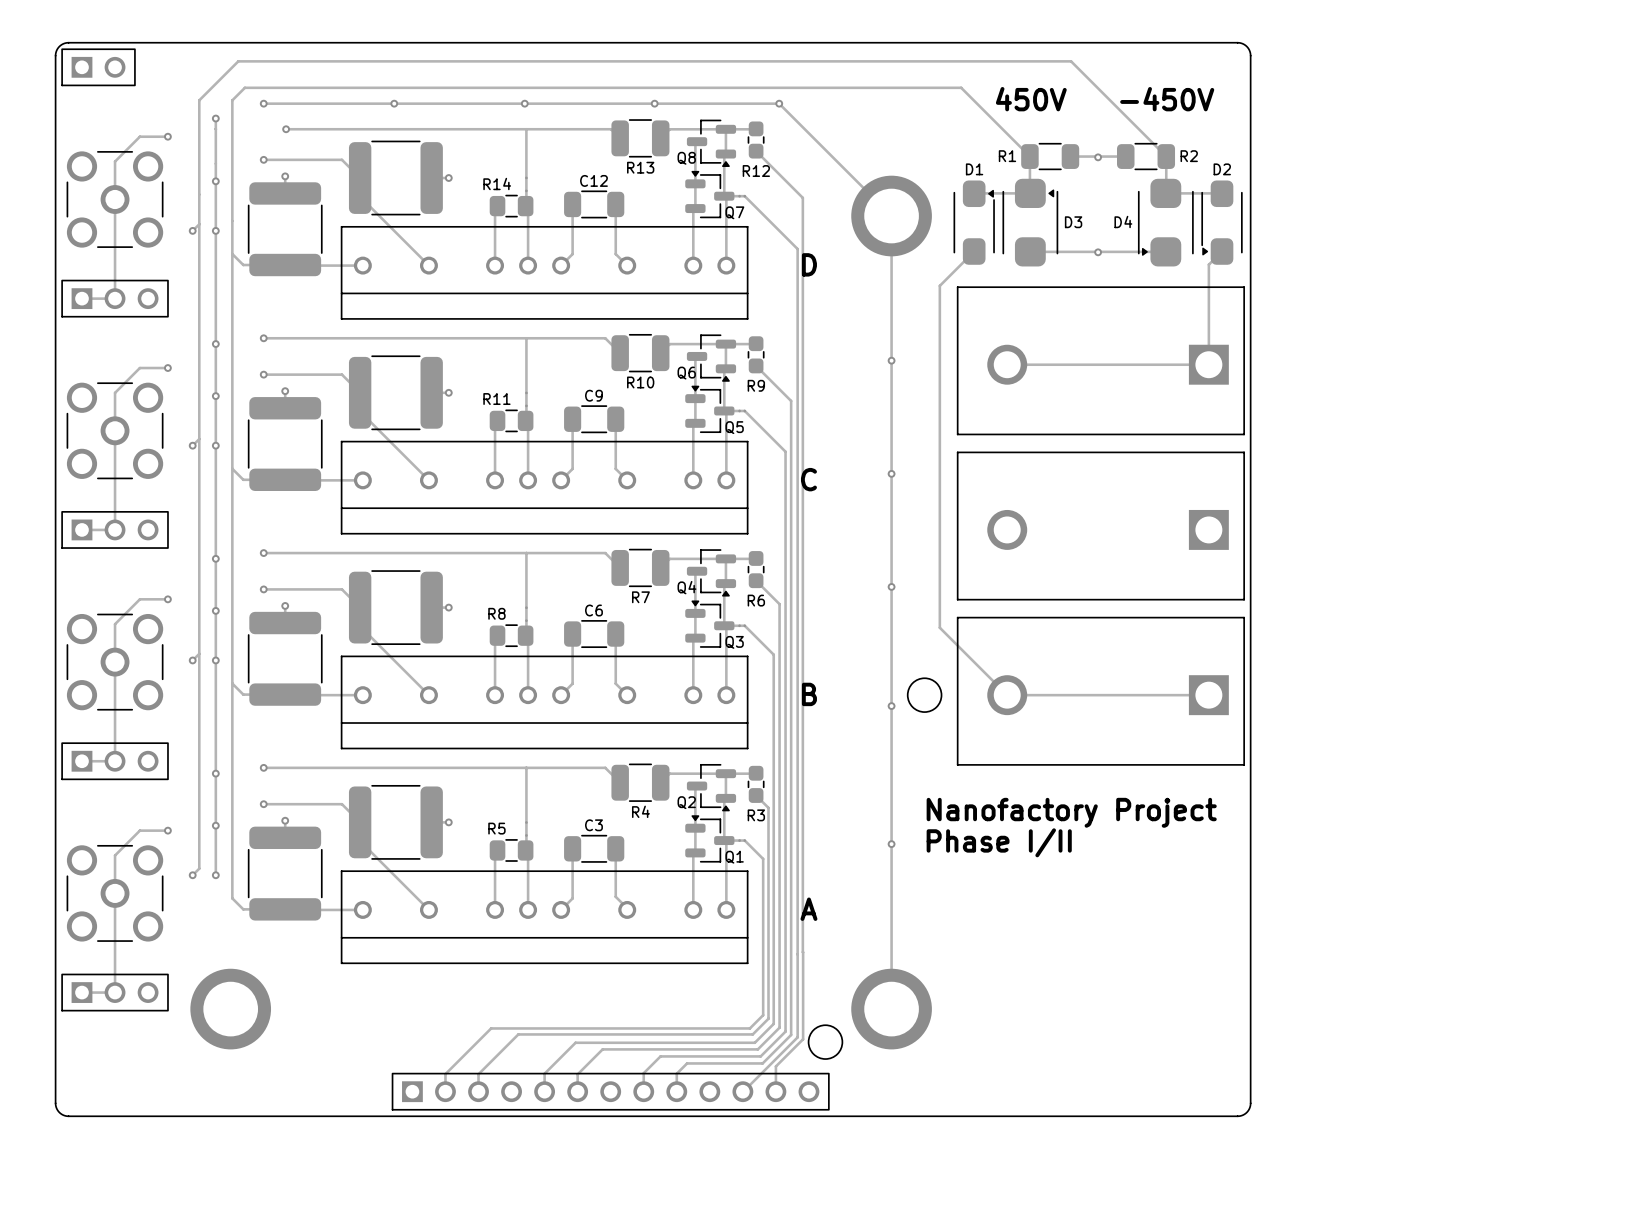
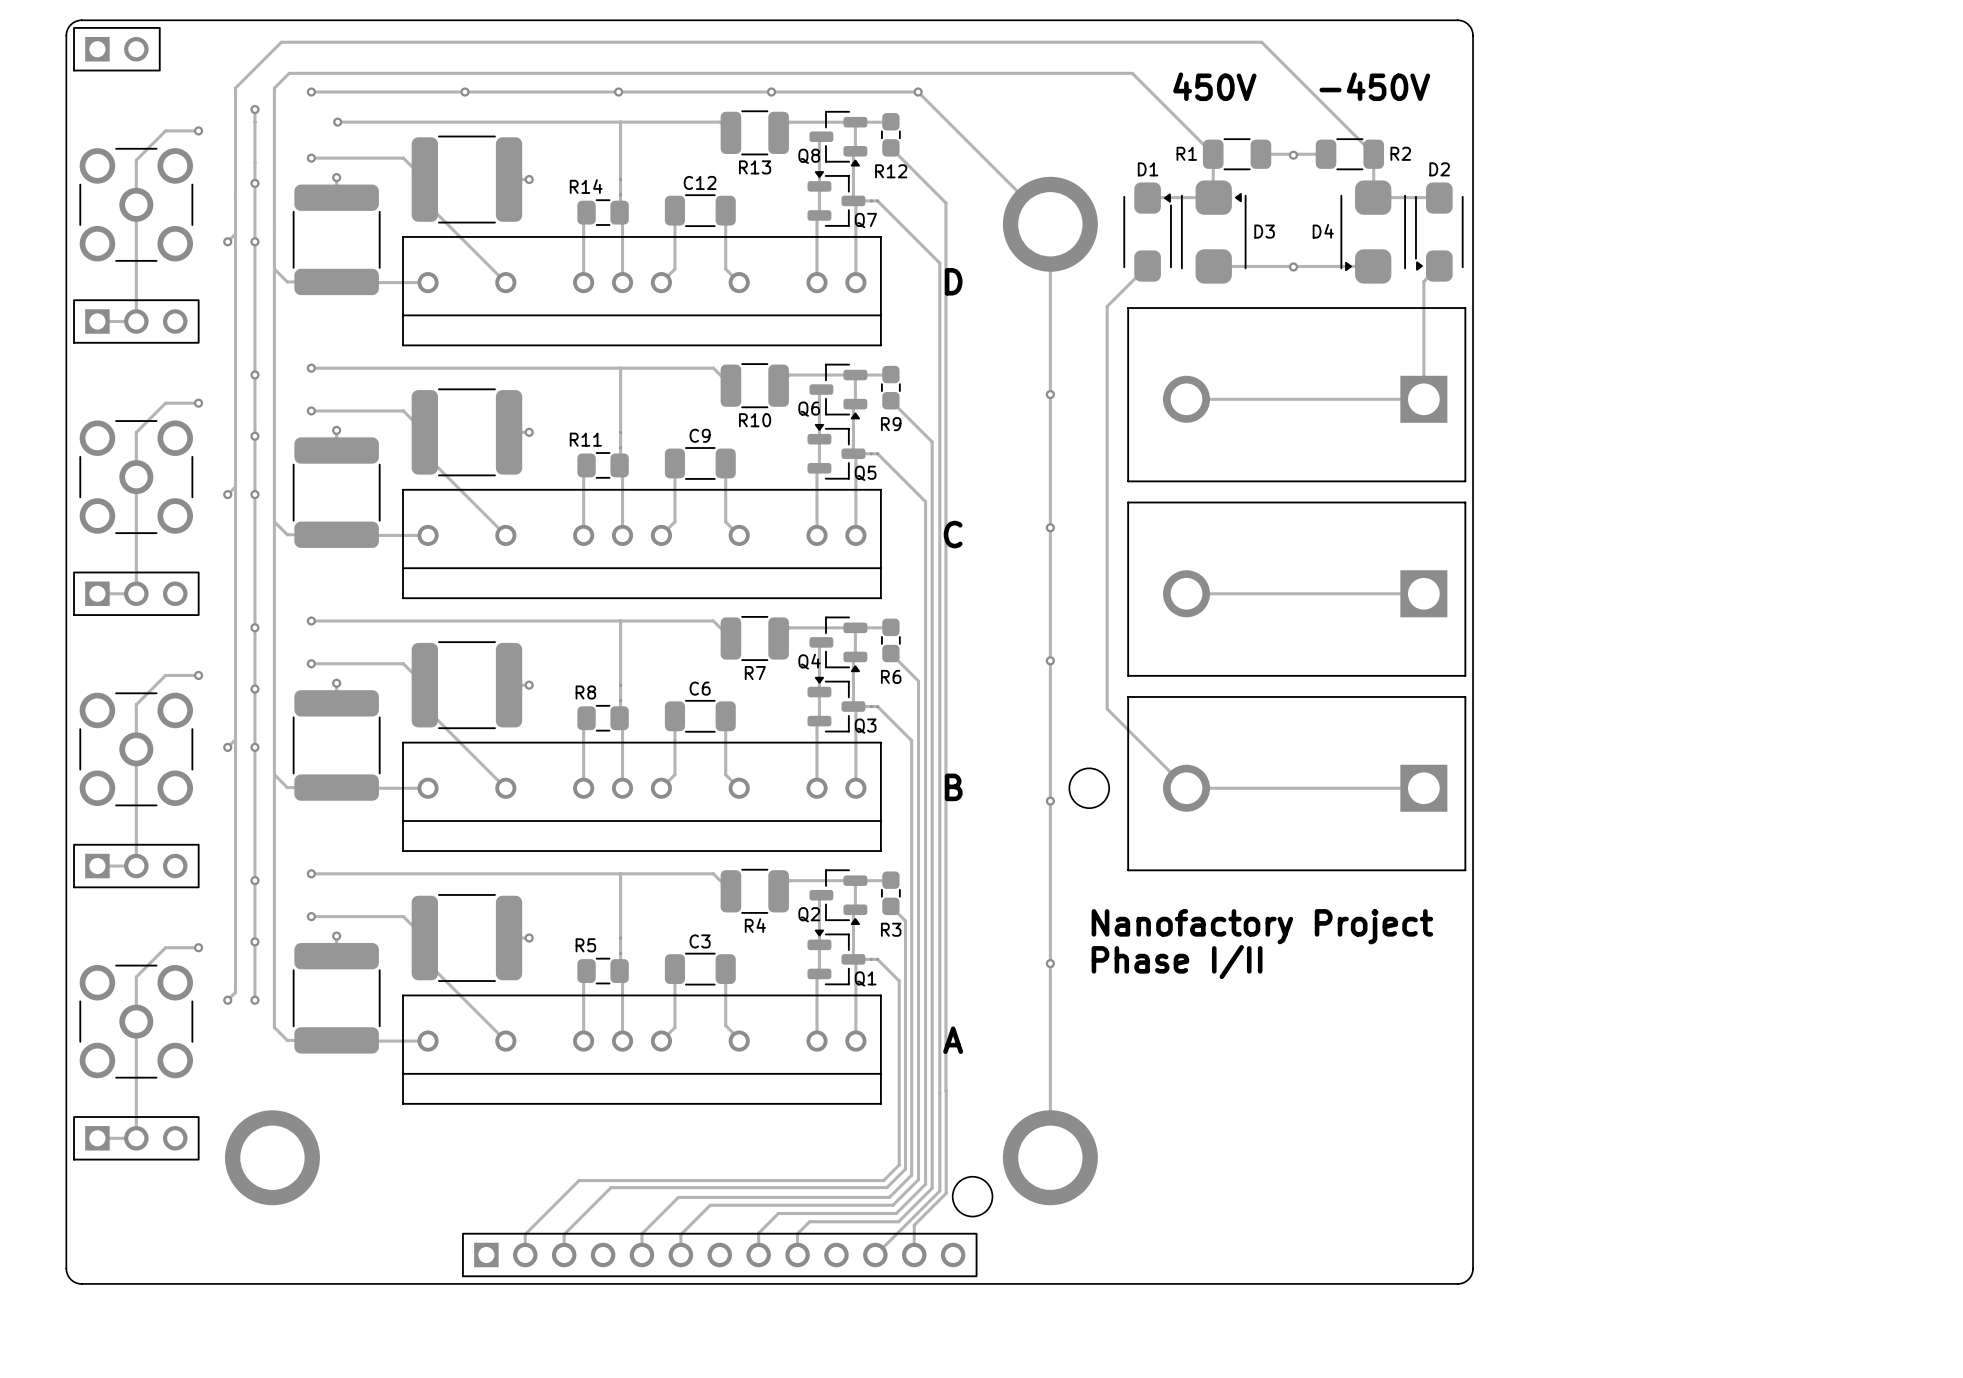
track: none -> (1186, 593) (1423, 593)

